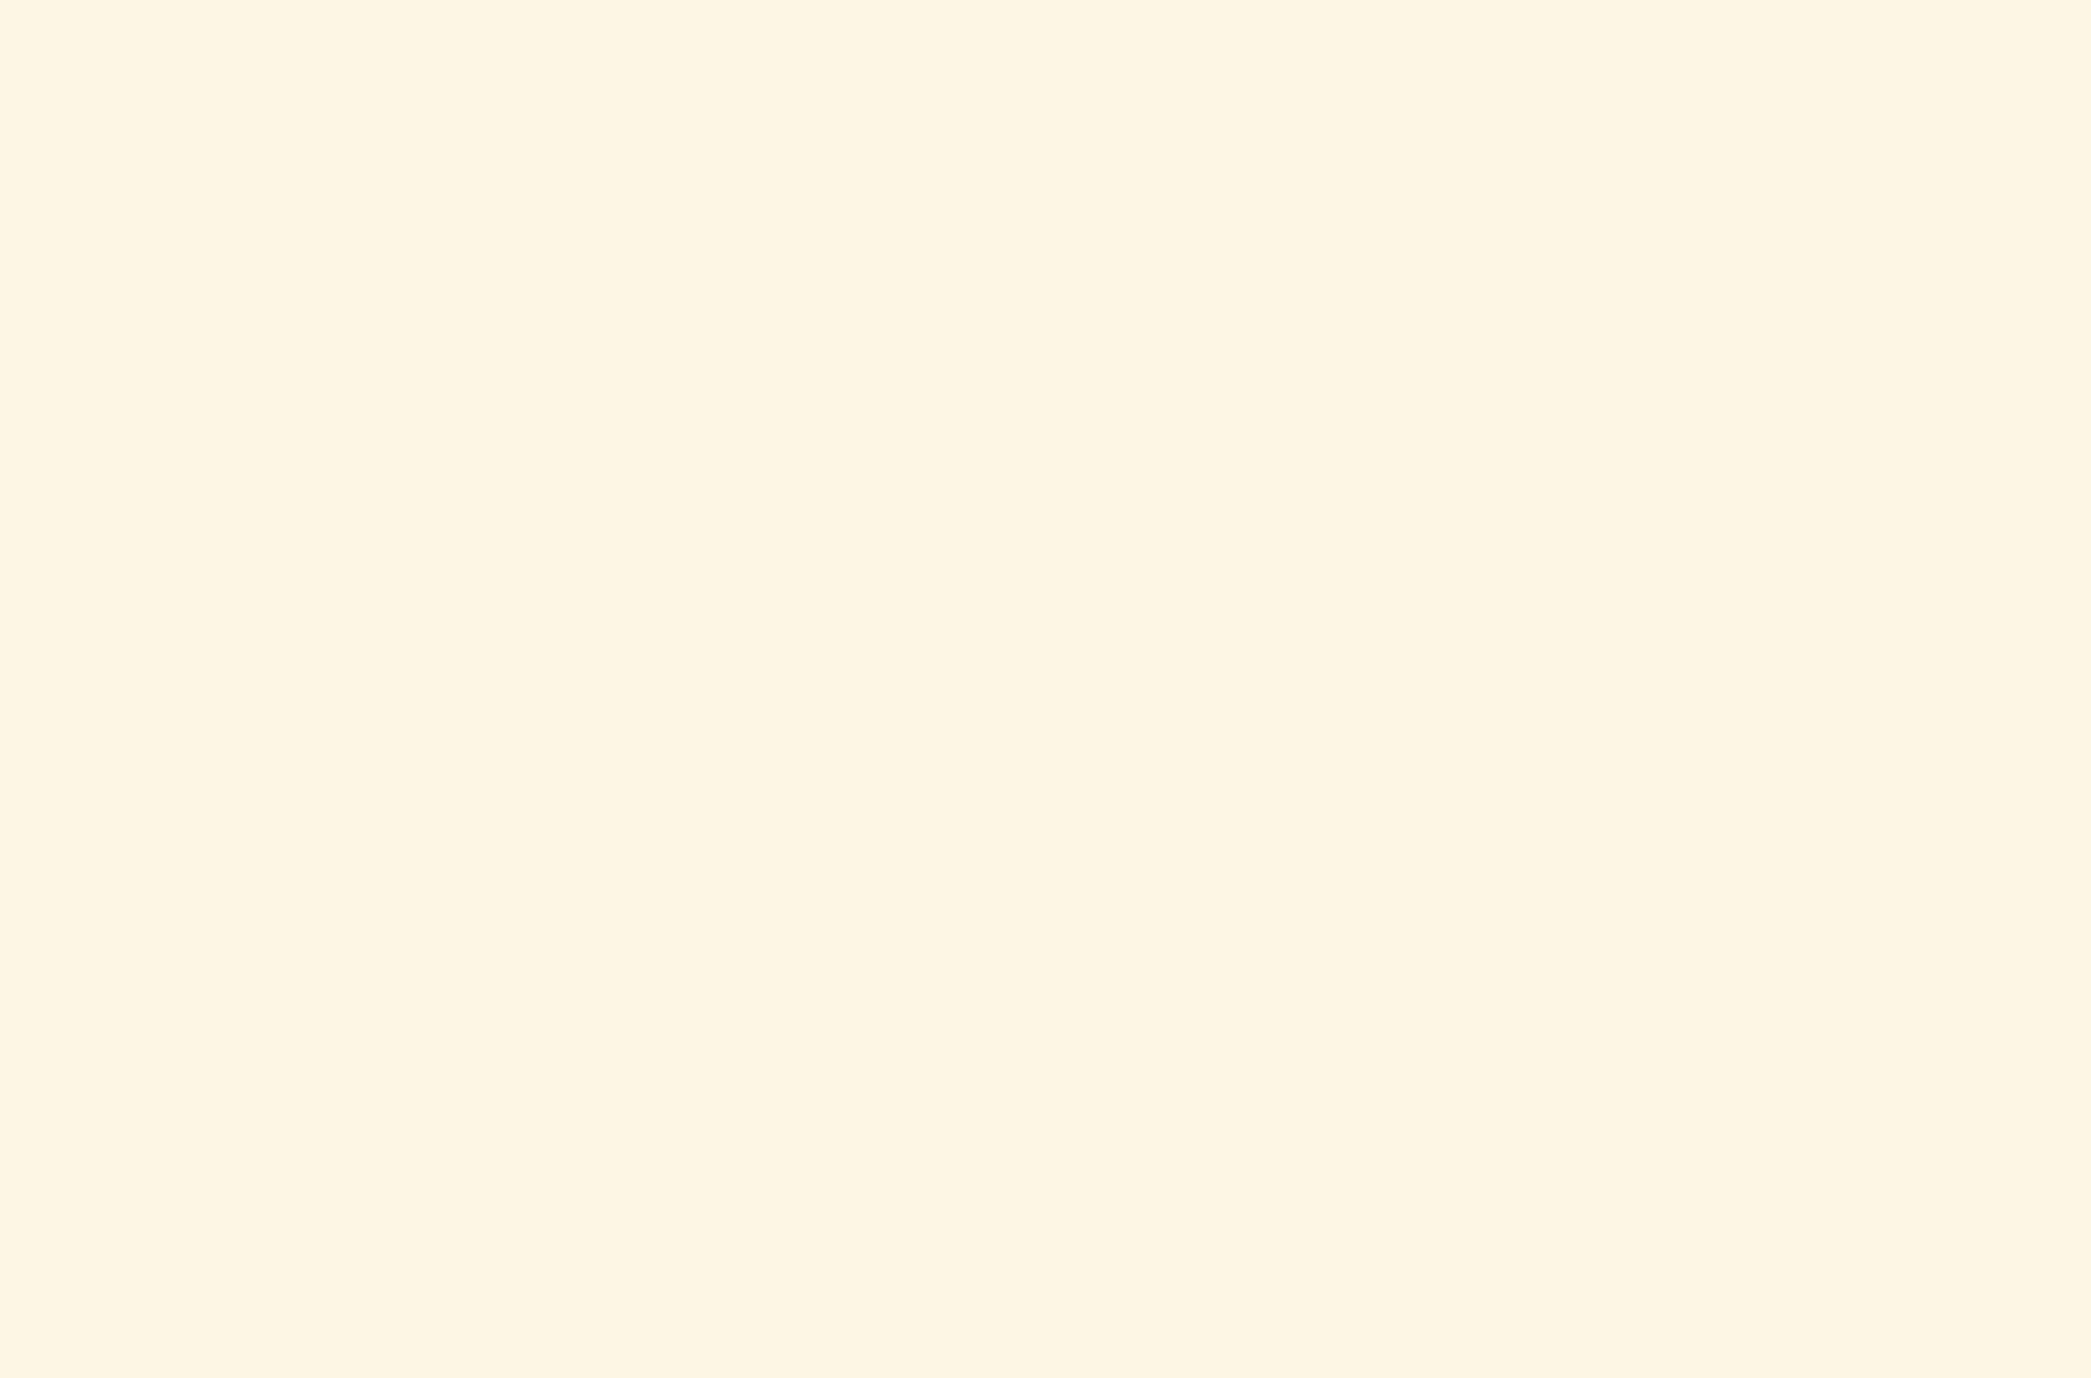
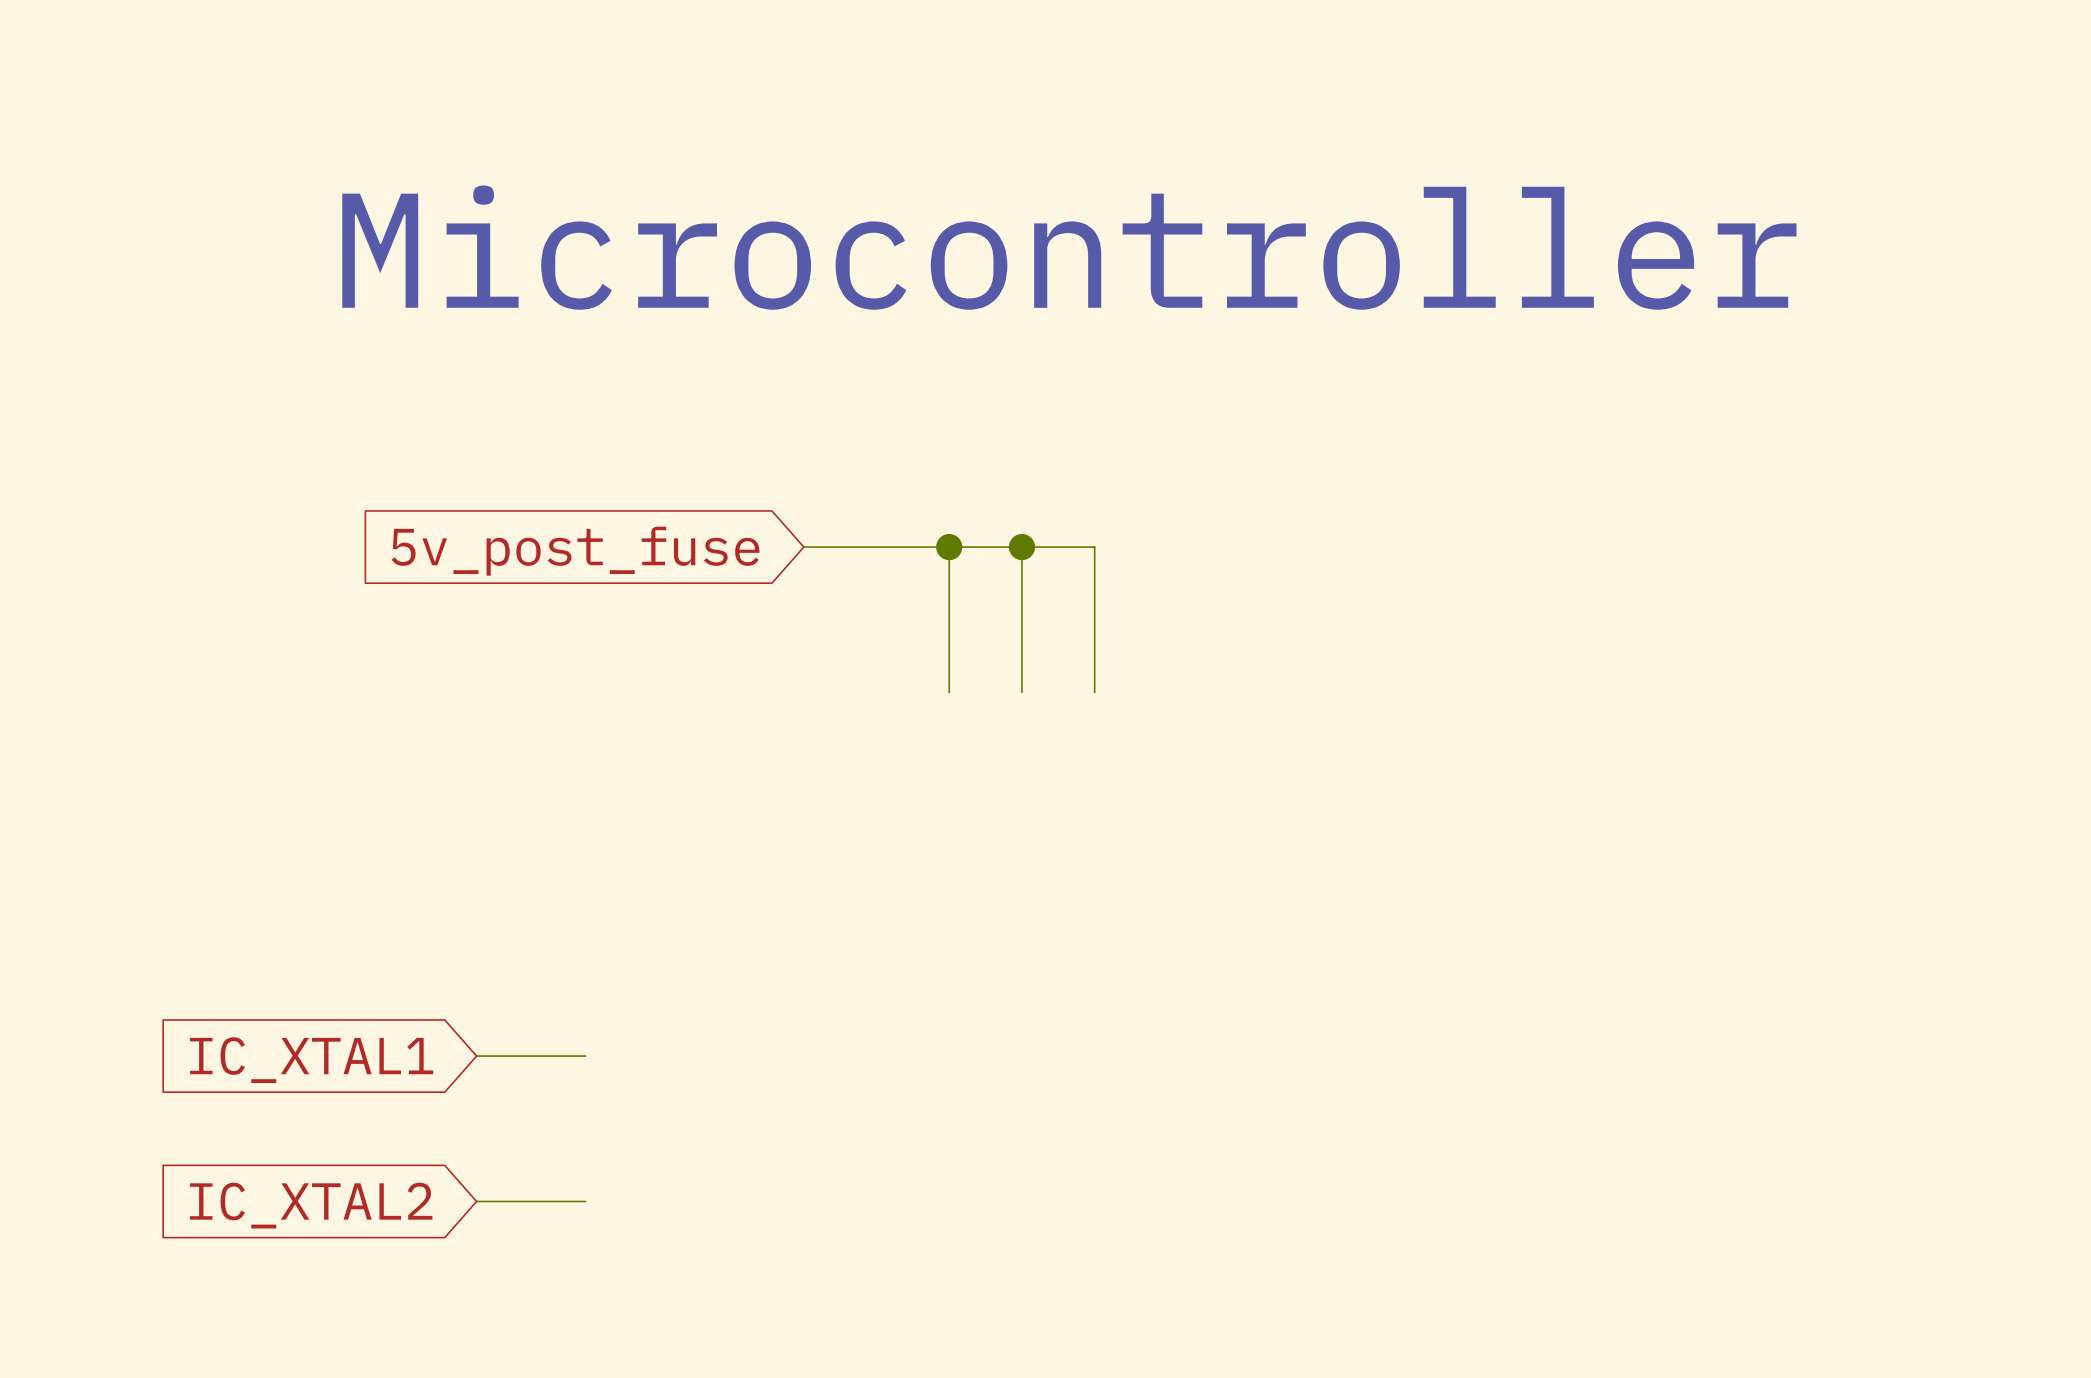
text: none -> Microcontroller (1069, 247)
wire: none -> (803, 547) (1094, 547) (1094, 692)
wire: none -> (949, 547) (949, 692)
junction: none -> (949, 547)
wire: none -> (1021, 547) (1021, 692)
junction: none -> (1021, 547)
global label: none -> 5v_post_fuse (575, 551)
wire: none -> (476, 1056) (585, 1056)
global label: none -> IC_XTAL1 (311, 1060)
wire: none -> (476, 1201) (585, 1201)
global label: none -> IC_XTAL2 (311, 1205)

